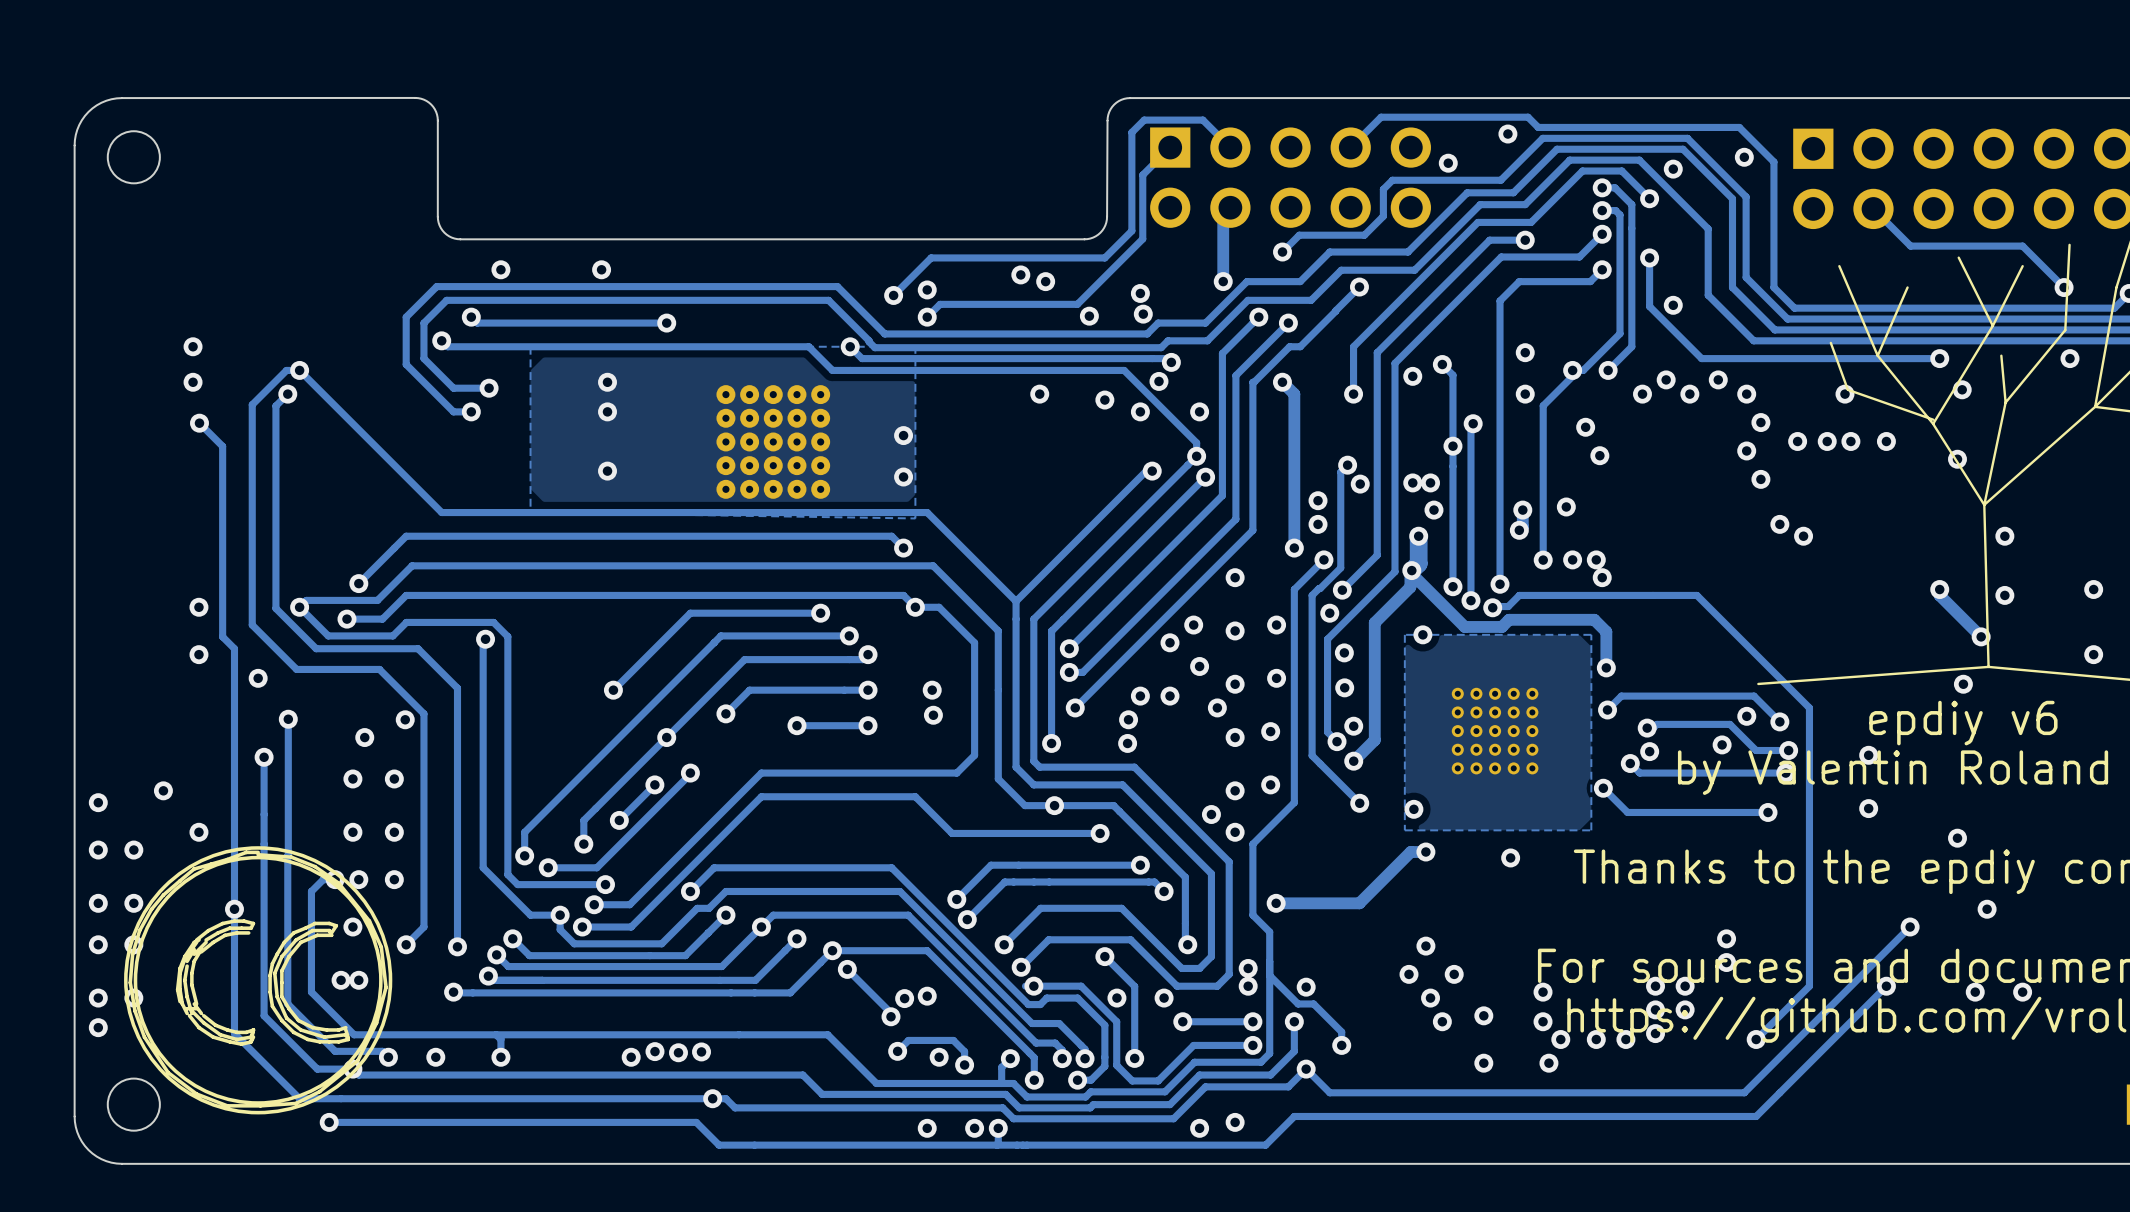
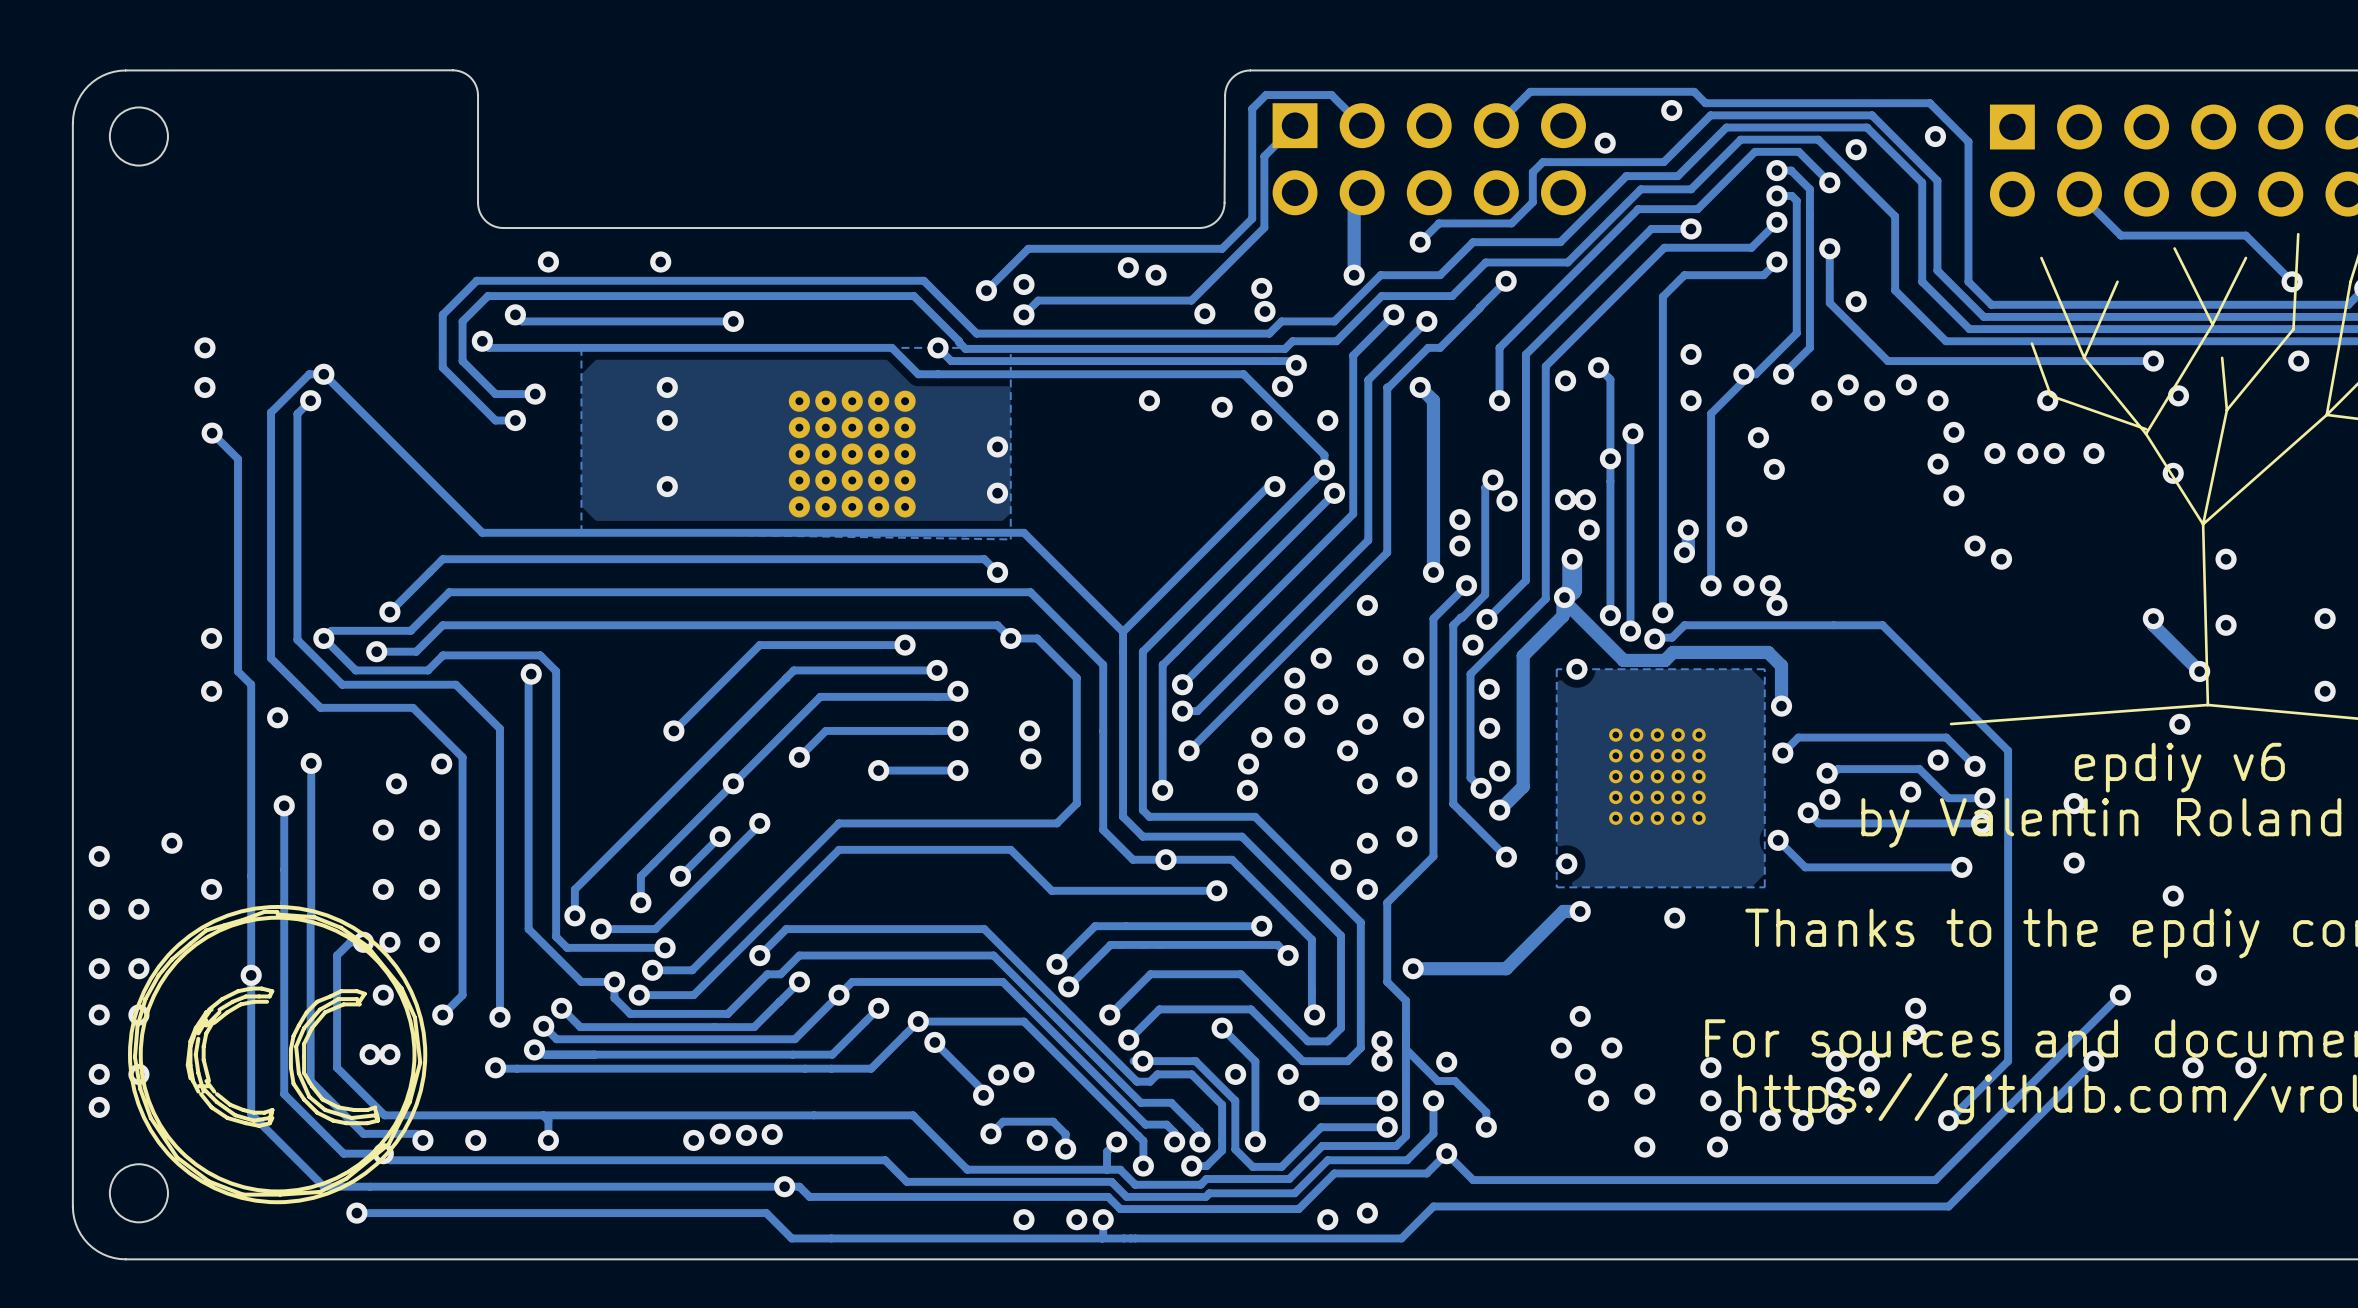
via: none -> (1295, 704)

